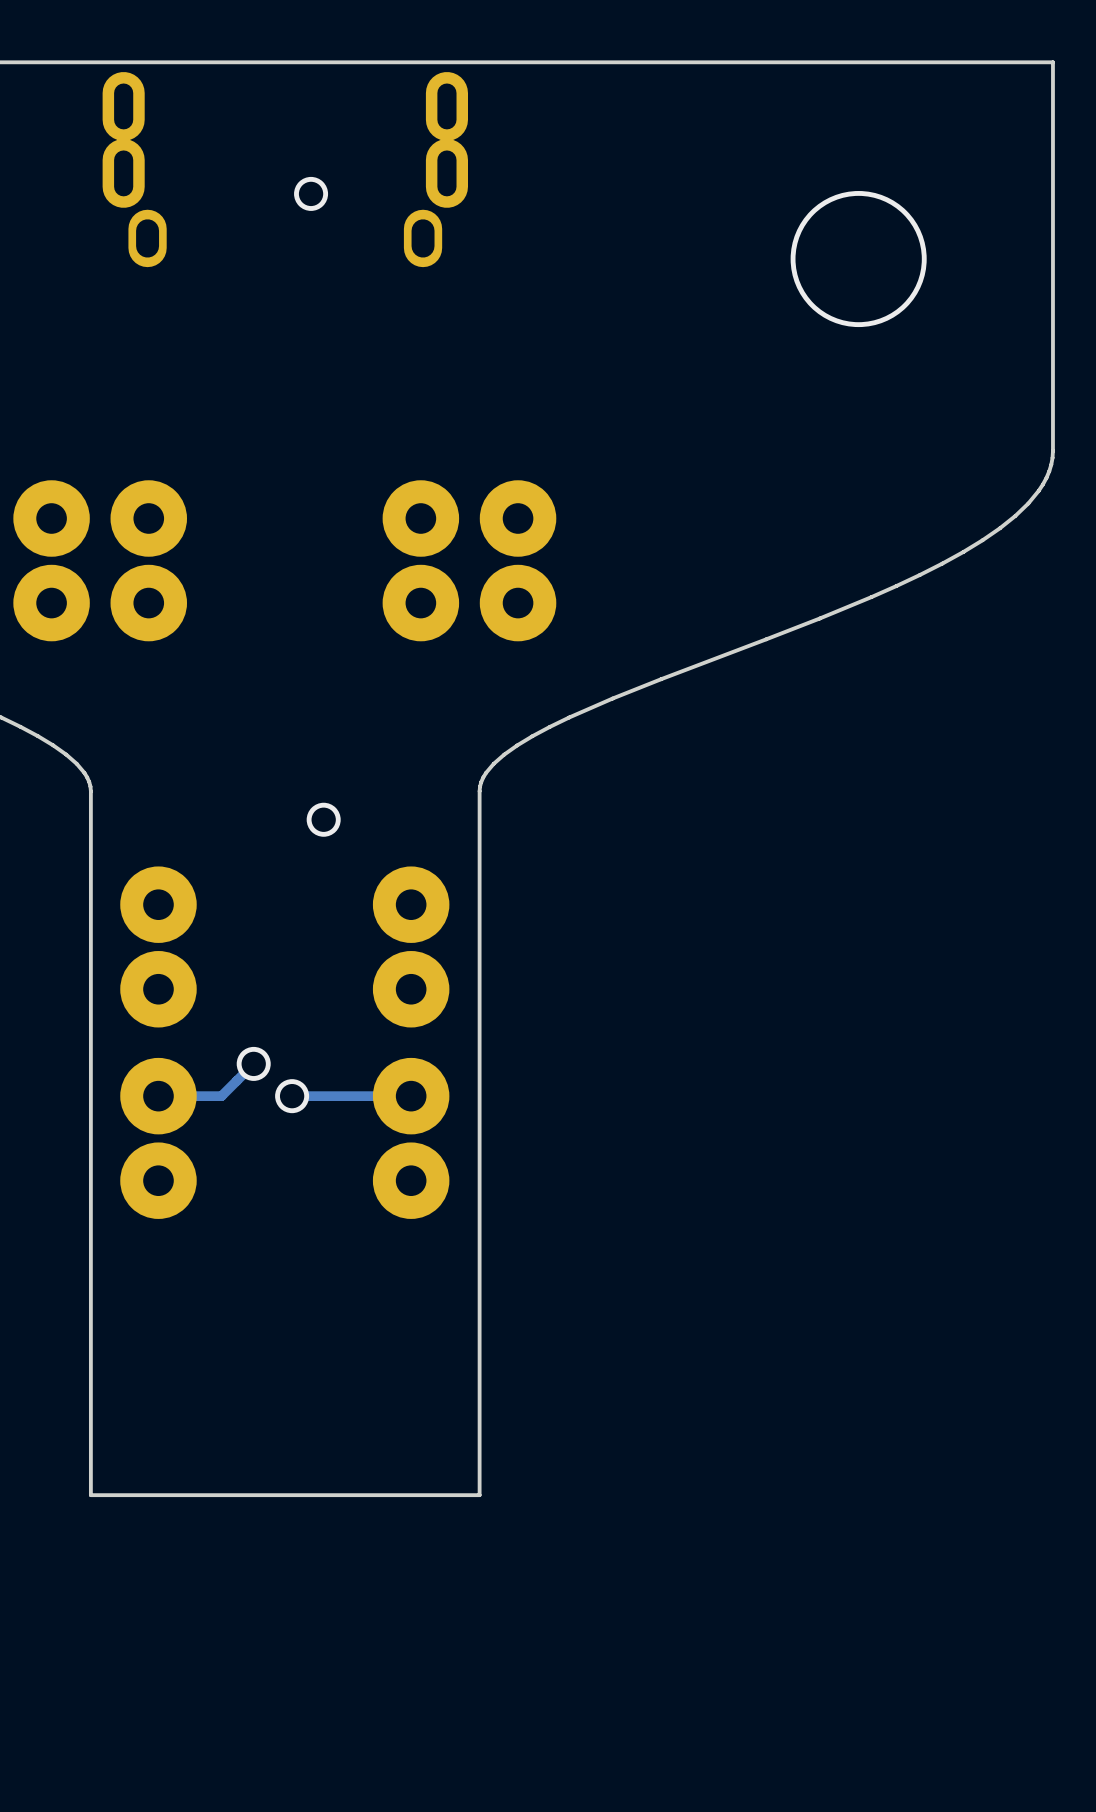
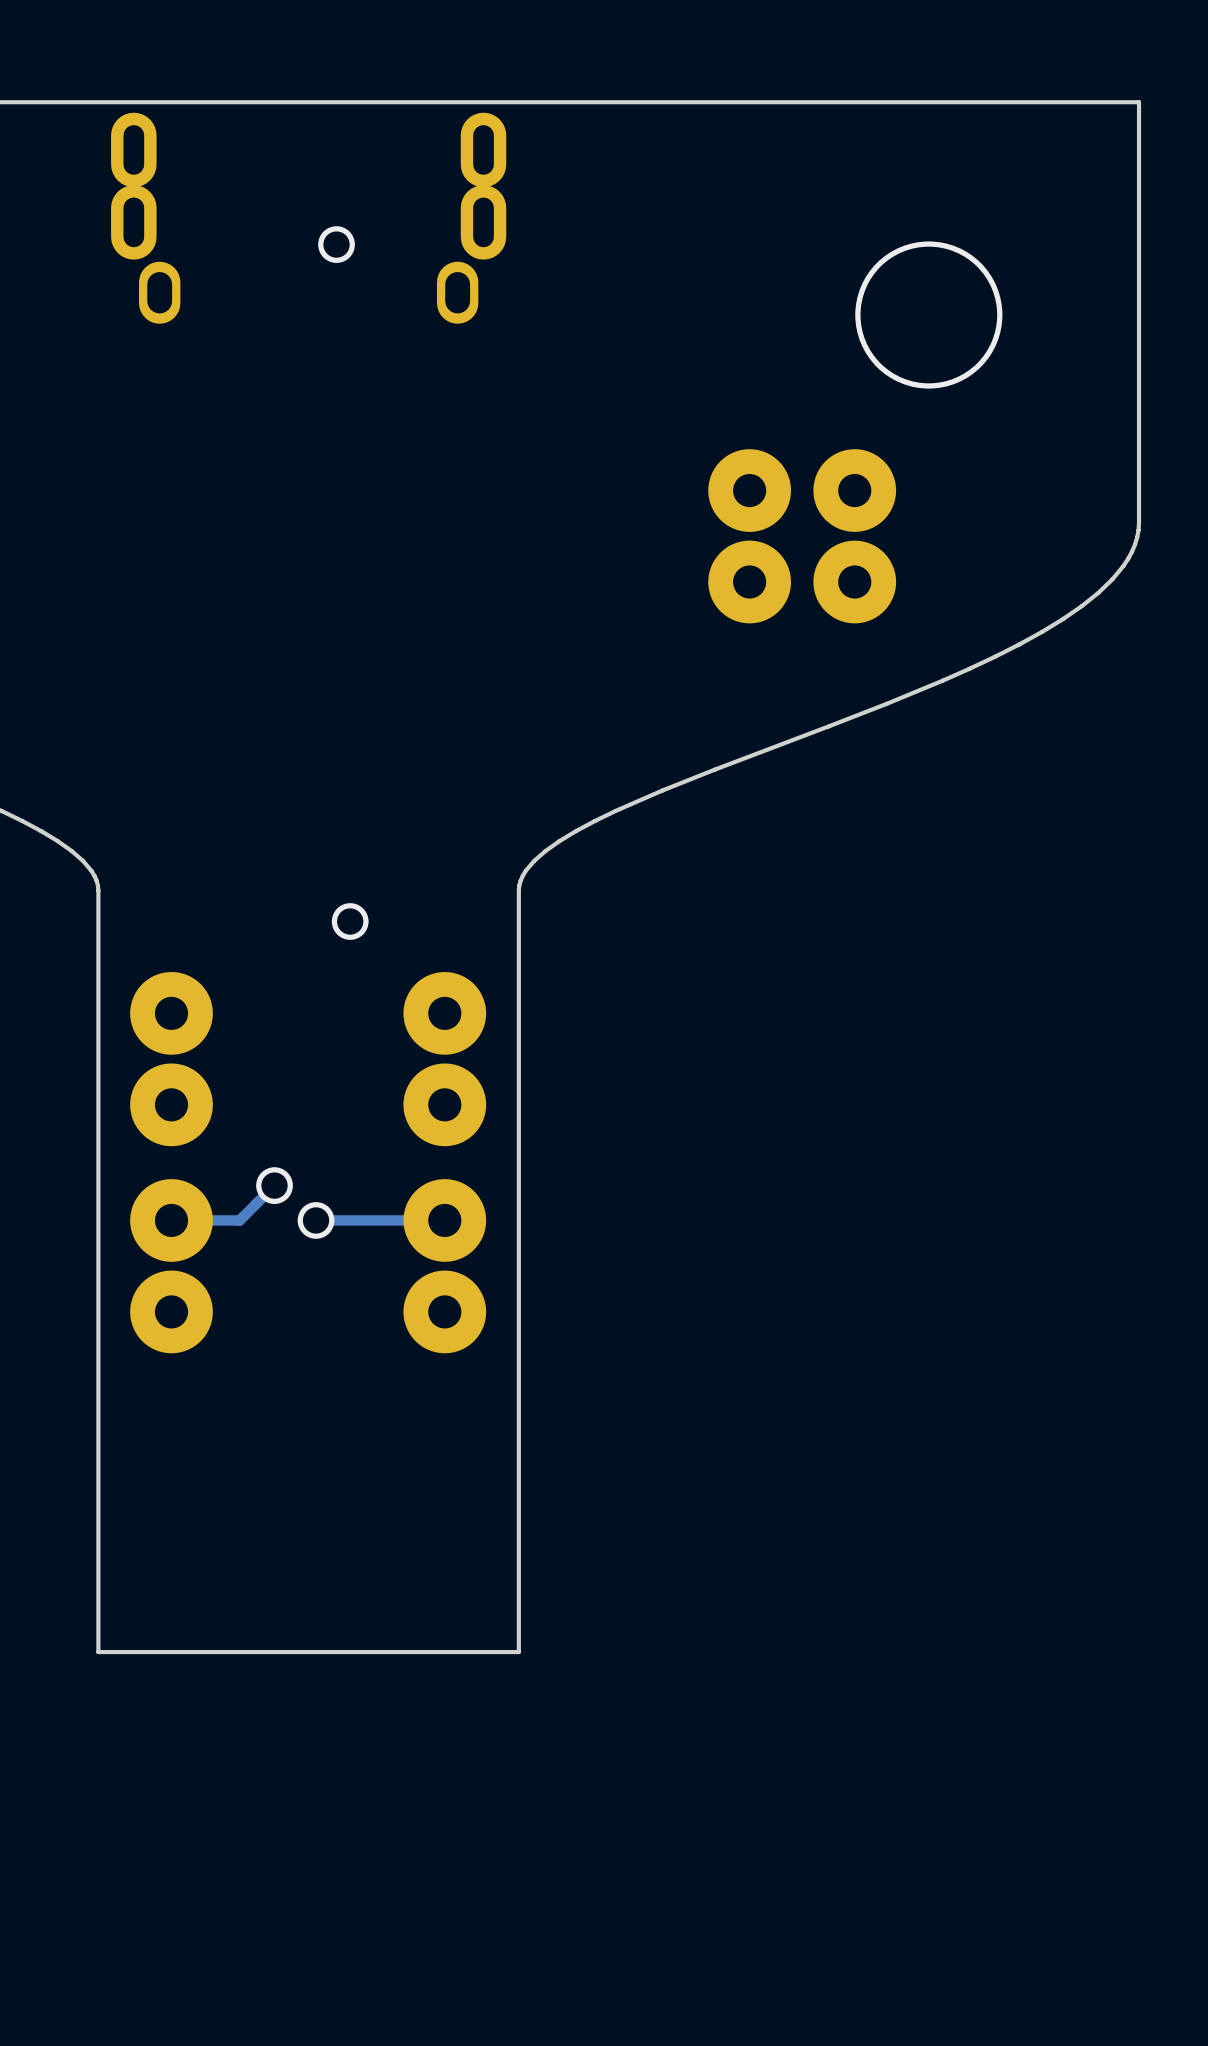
part: none -> (749, 536)
part: none -> (854, 536)
part: (51, 560) -> none
part: (148, 560) -> none
part: (420, 560) -> none
part: (518, 560) -> none

